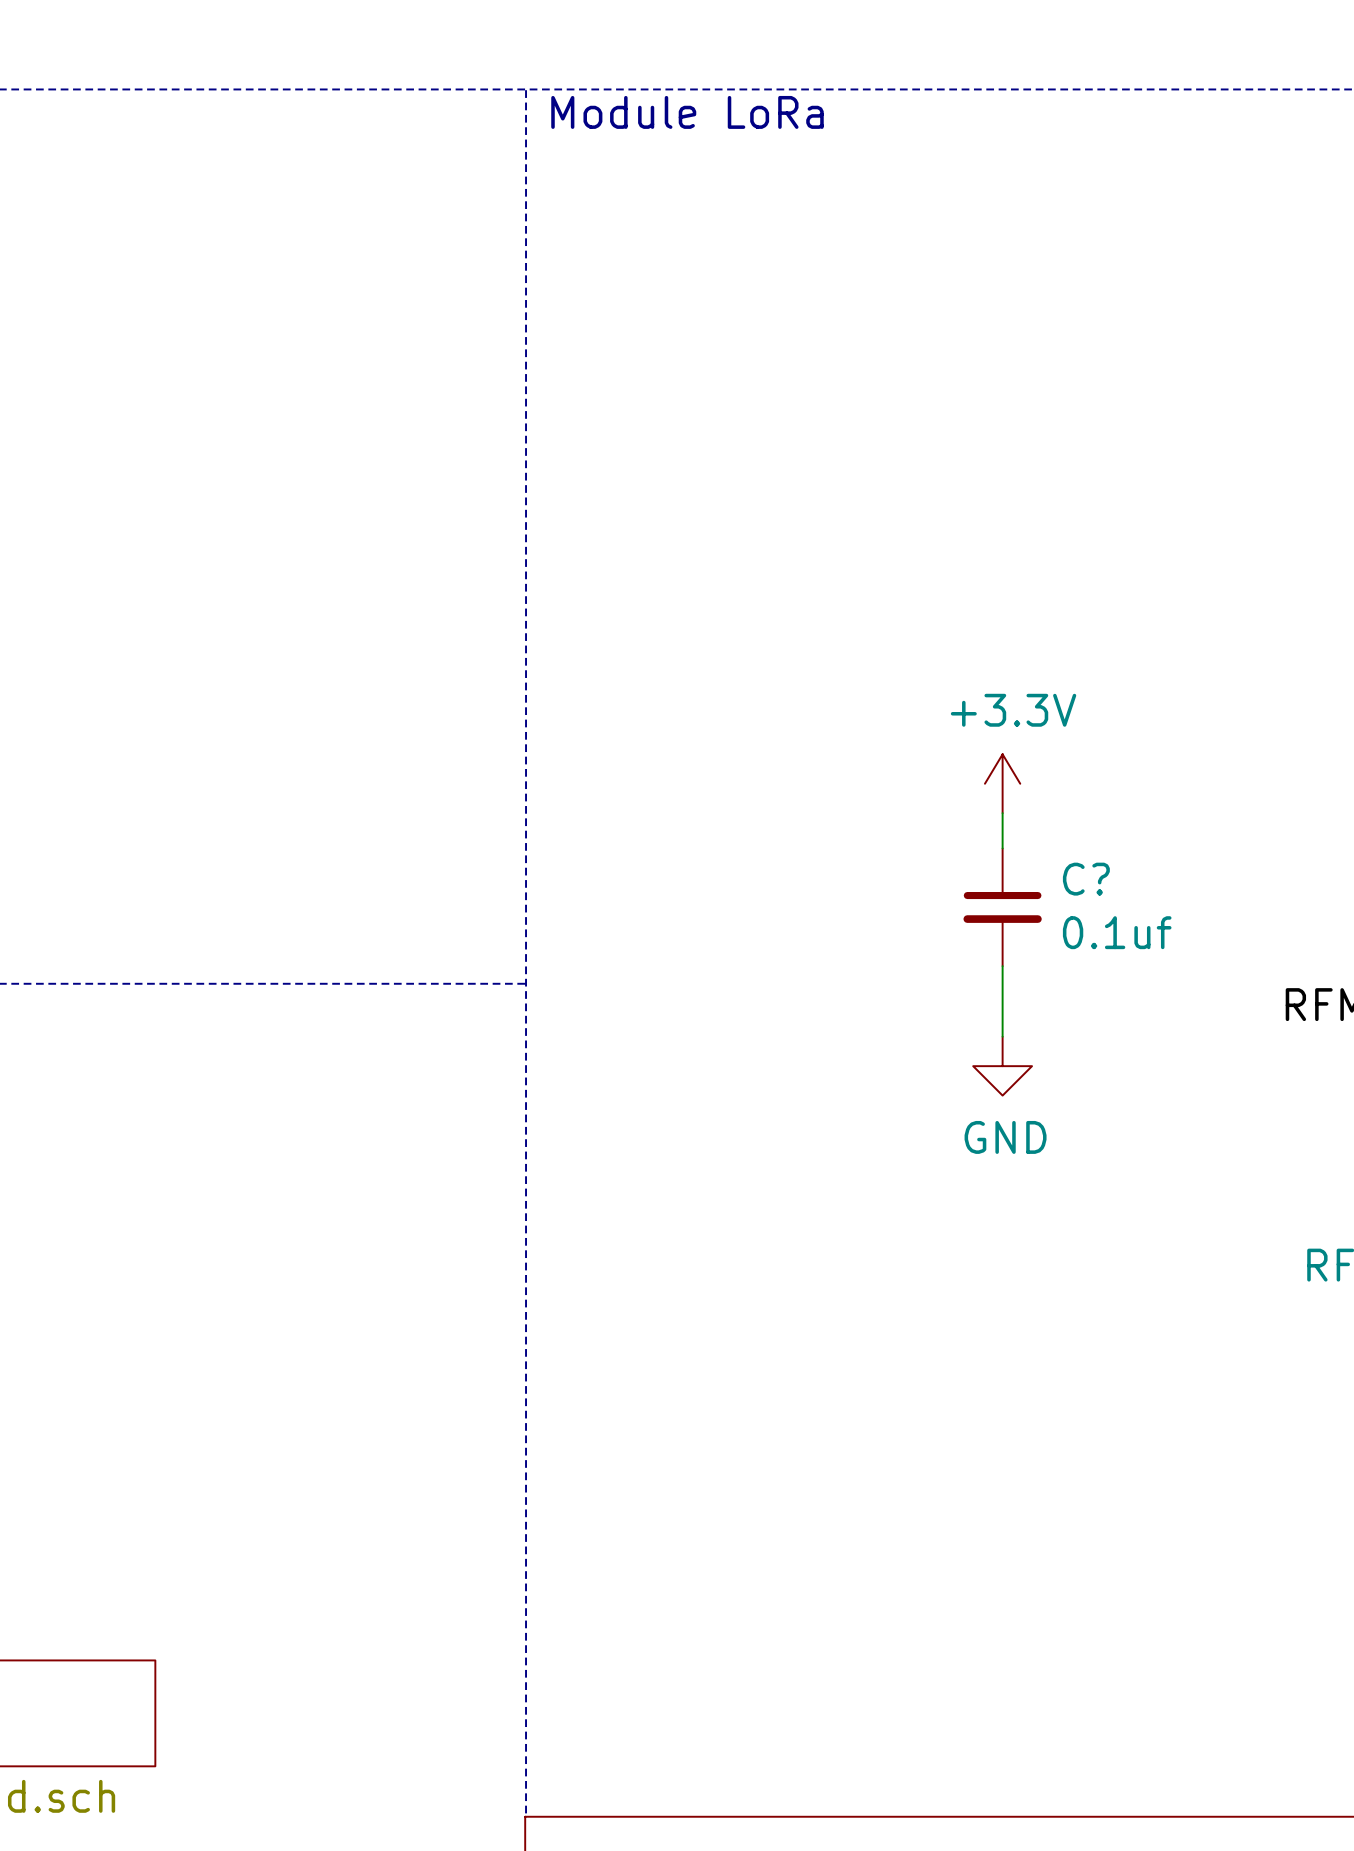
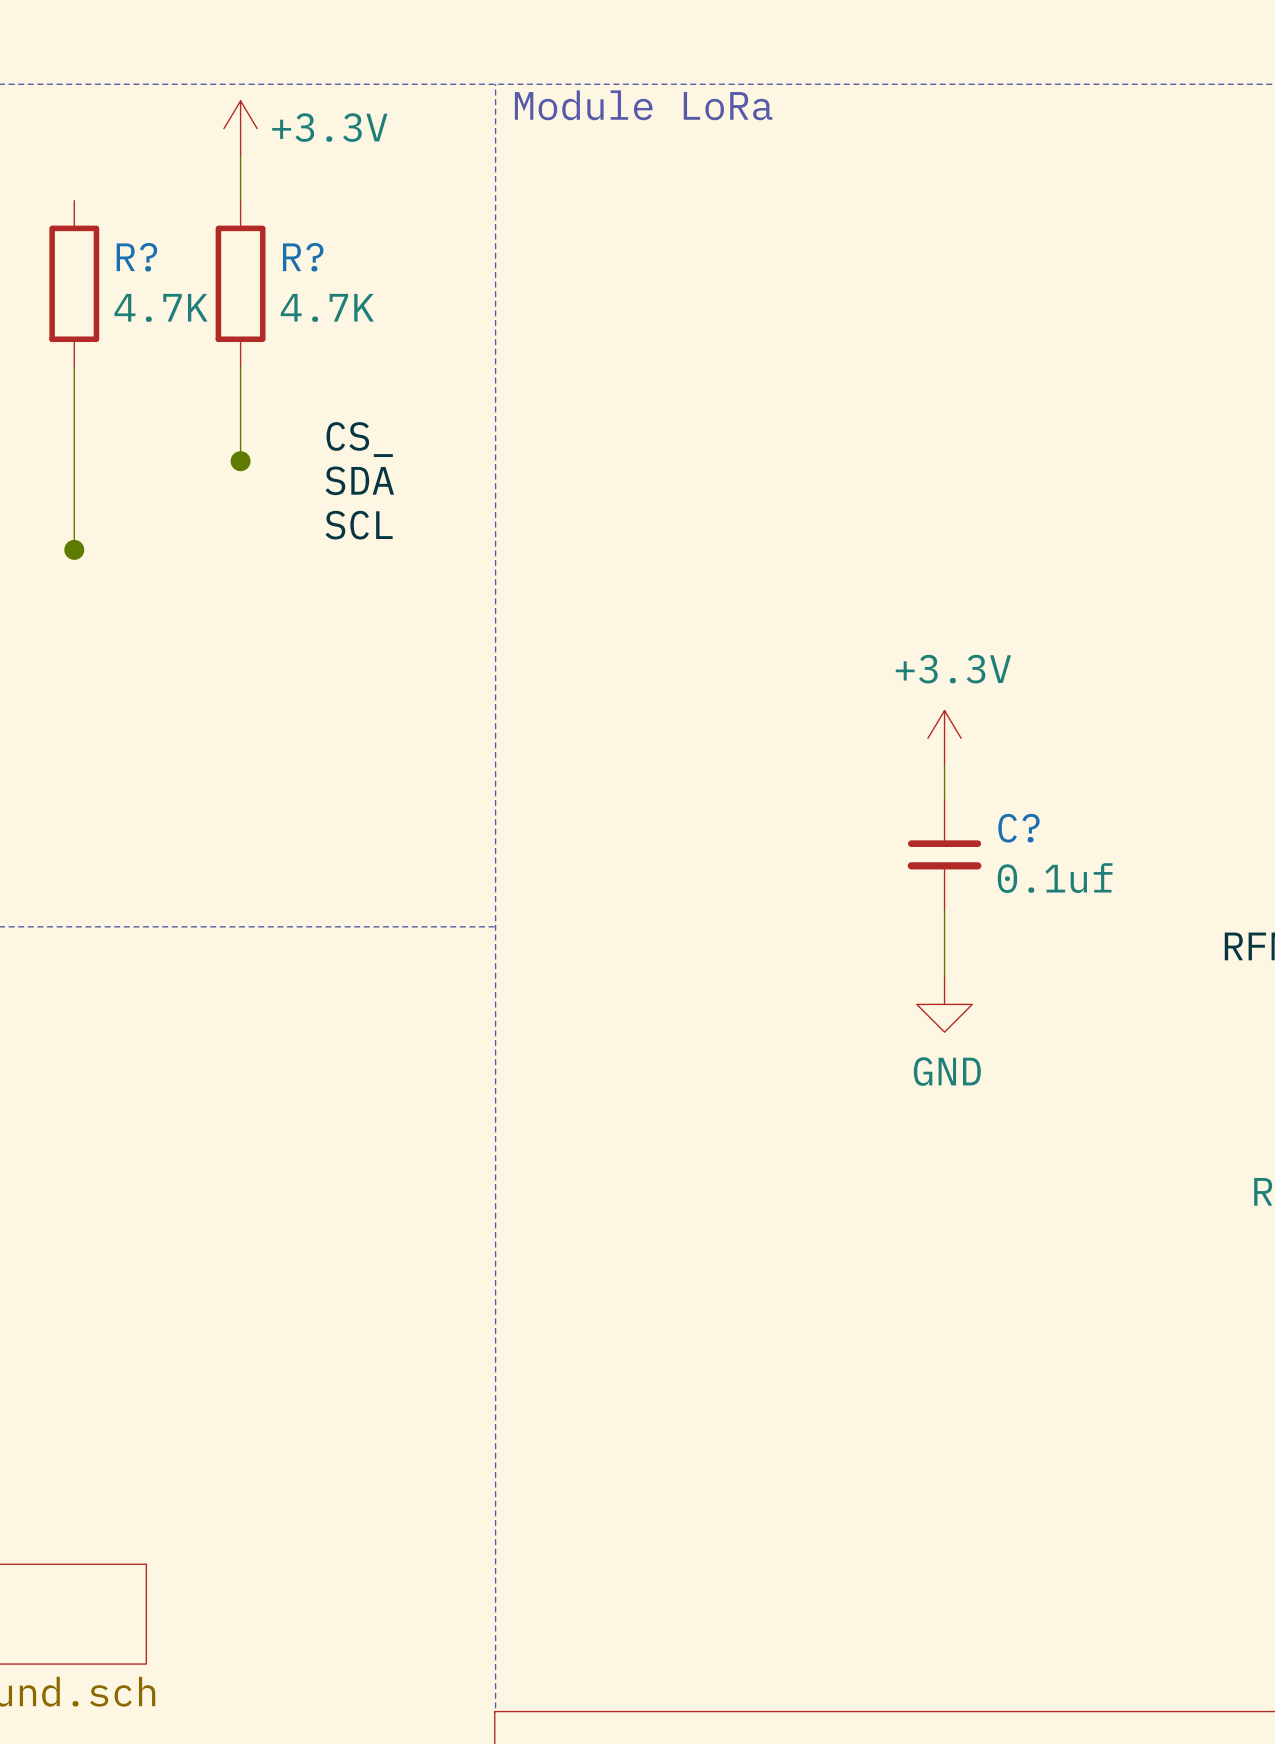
power symbol: none -> +3.3V (240, 128)
wire: none -> (240, 156) (240, 200)
R?: none -> 4.7K (74, 283)
R?: none -> 4.7K (240, 283)
wire: none -> (74, 366) (74, 549)
wire: none -> (240, 366) (240, 461)
label: none -> CS_ (359, 439)
junction: none -> (240, 461)
label: none -> SDA (359, 480)
label: none -> SCL (359, 525)
junction: none -> (74, 549)

